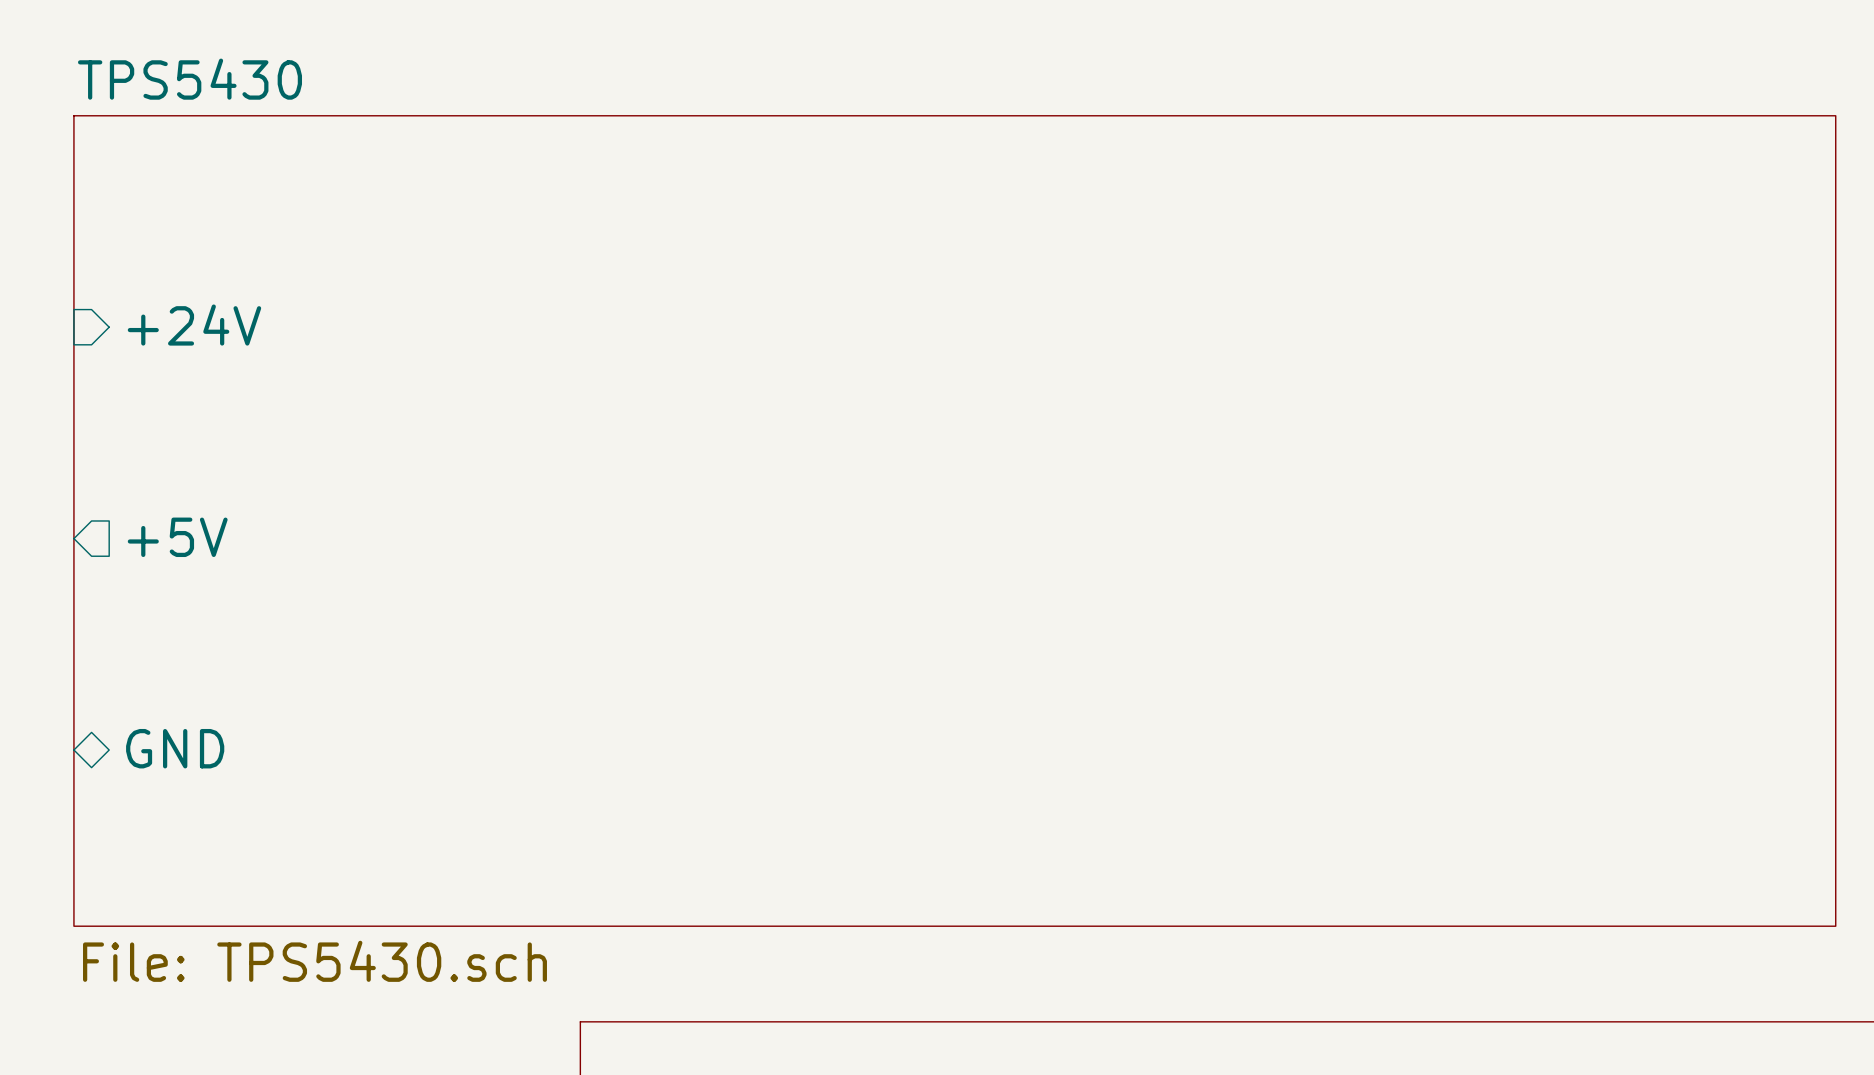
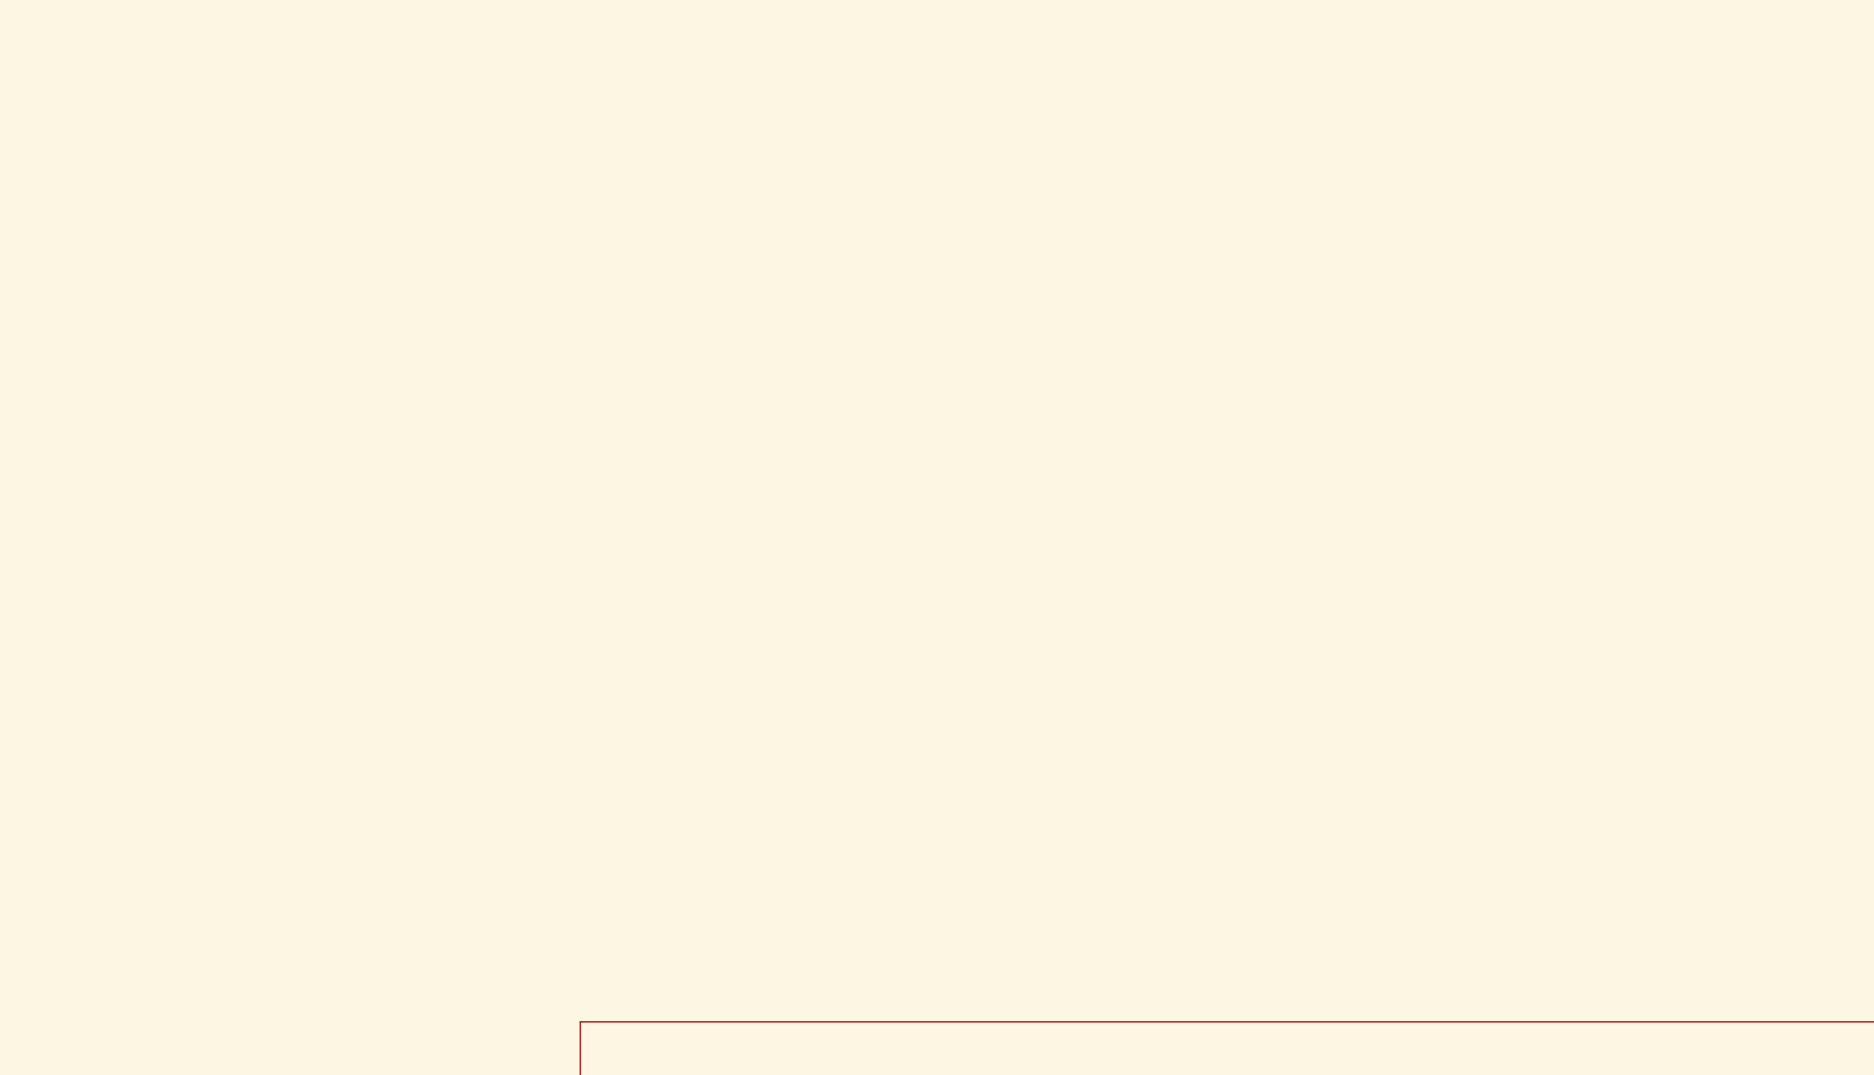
sheet pin: +24V (194, 325) -> none
sheet TPS5430: File: TPS5430.sch (954, 520) -> none
sheet pin: +5V (177, 537) -> none
sheet pin: GND (175, 748) -> none

